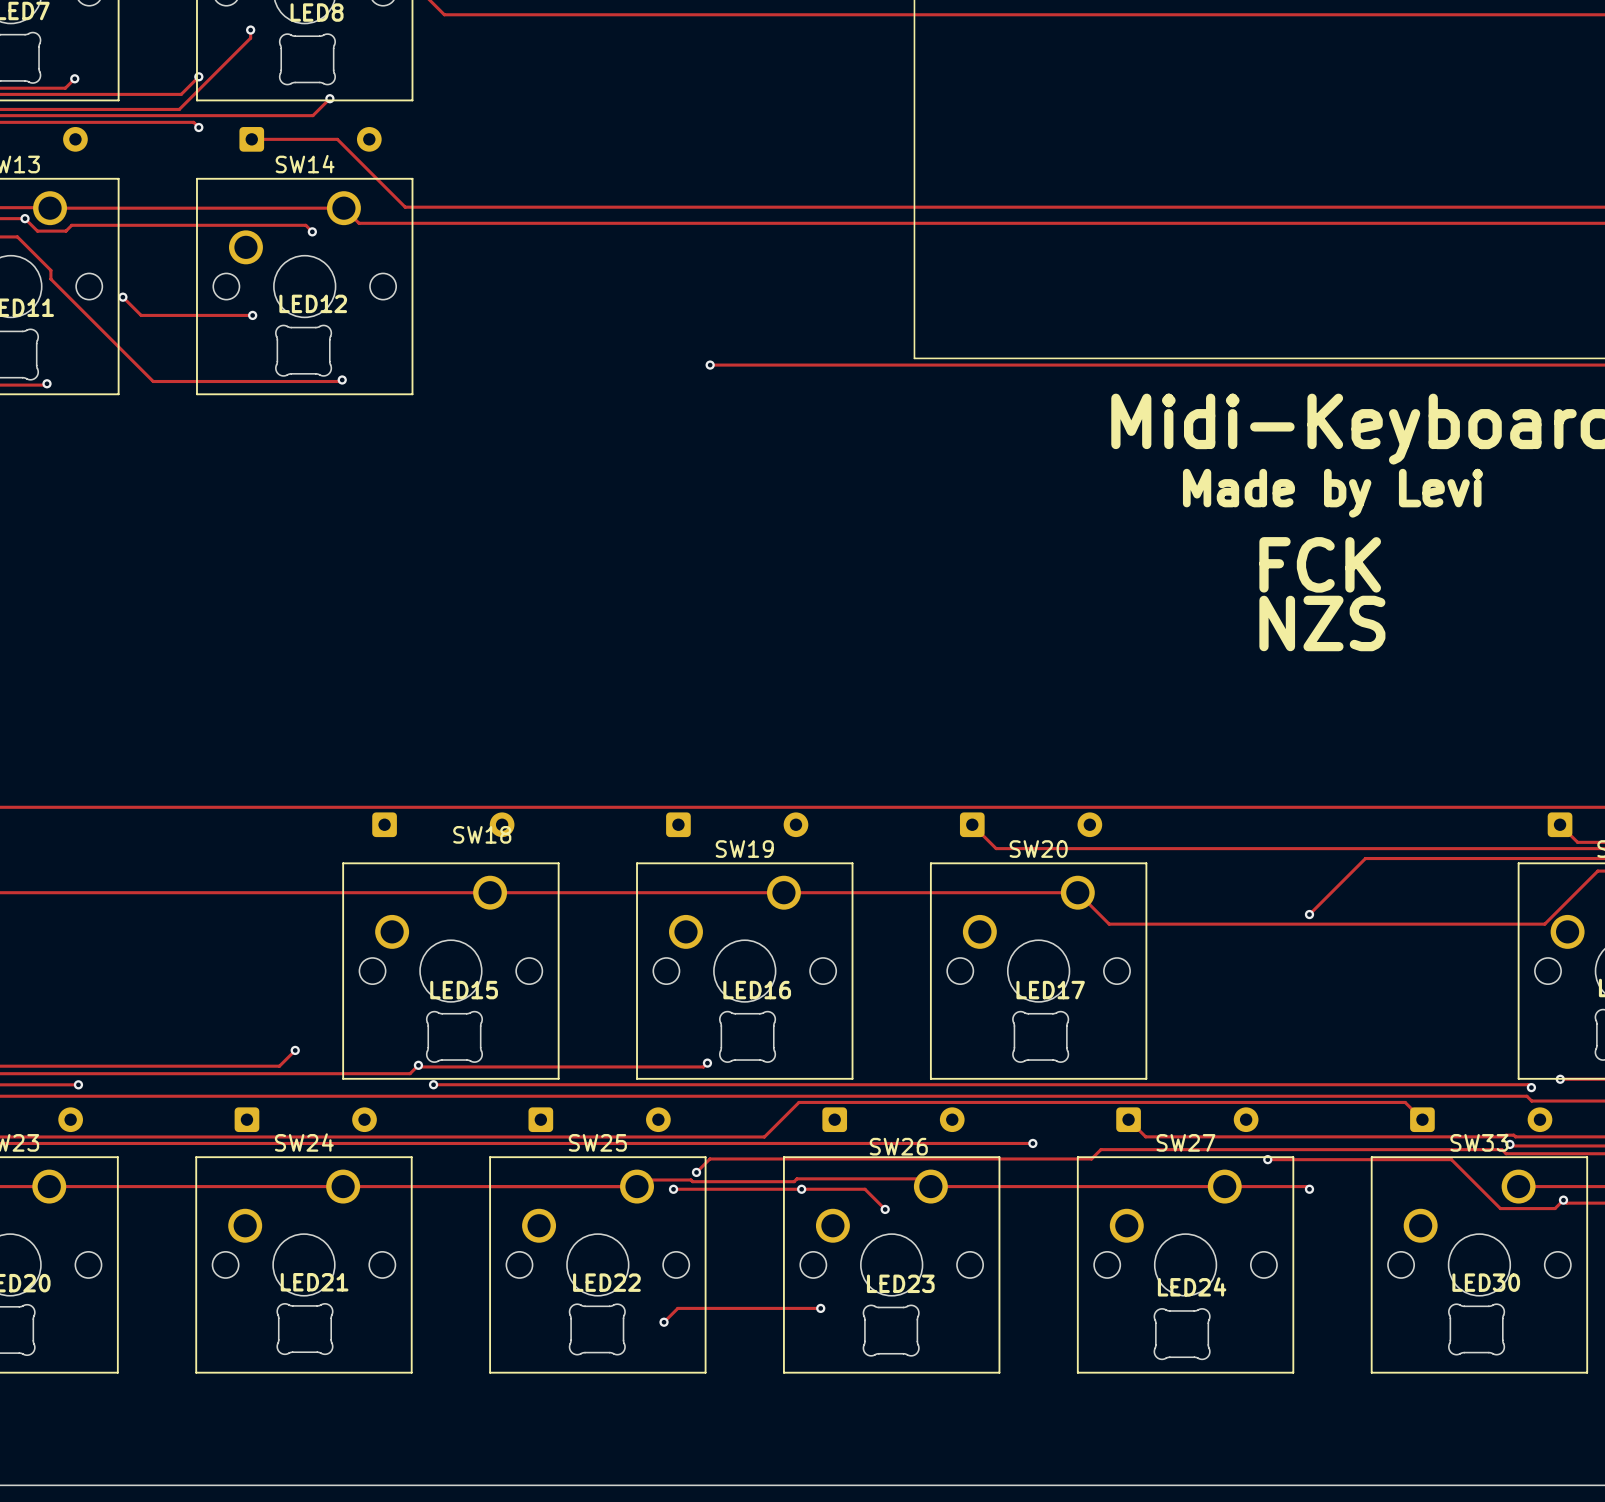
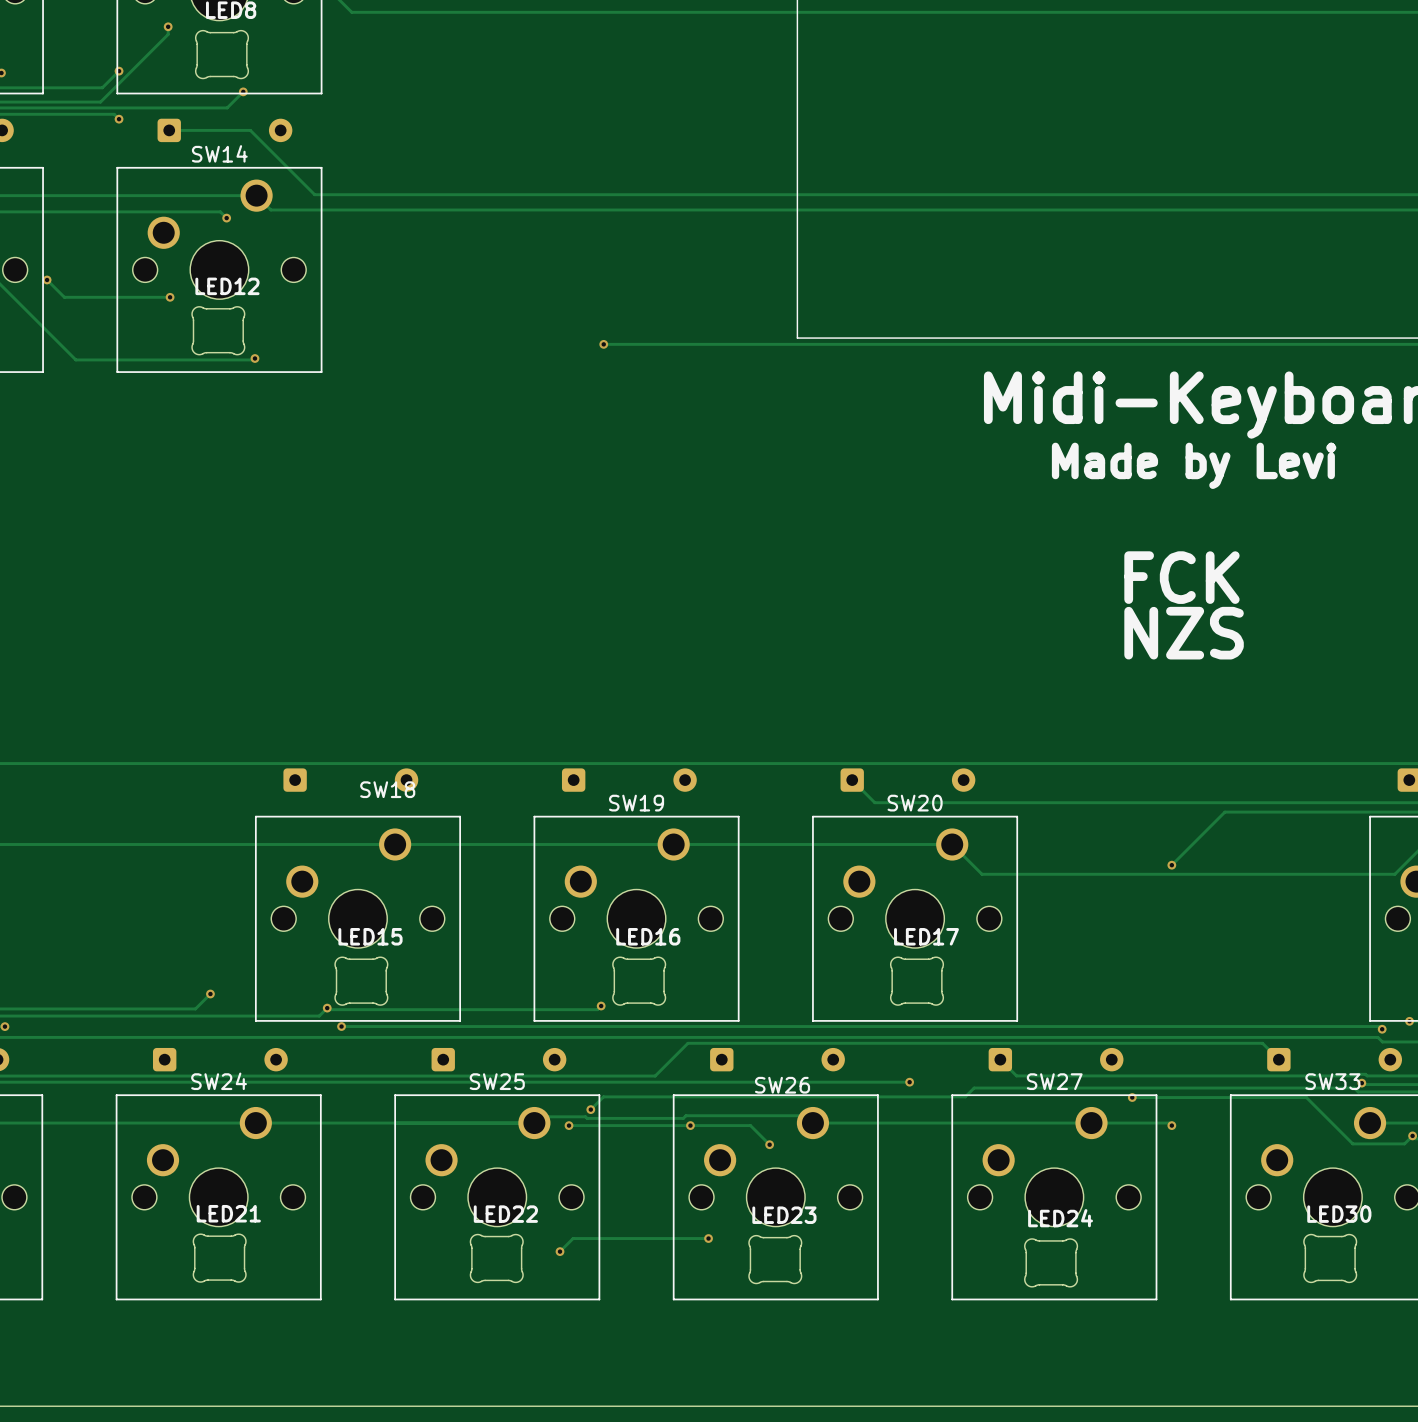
text position: FCK (1320, 564) -> FCK (1181, 577)
text position: NZS (1322, 623) -> NZS (1184, 633)

